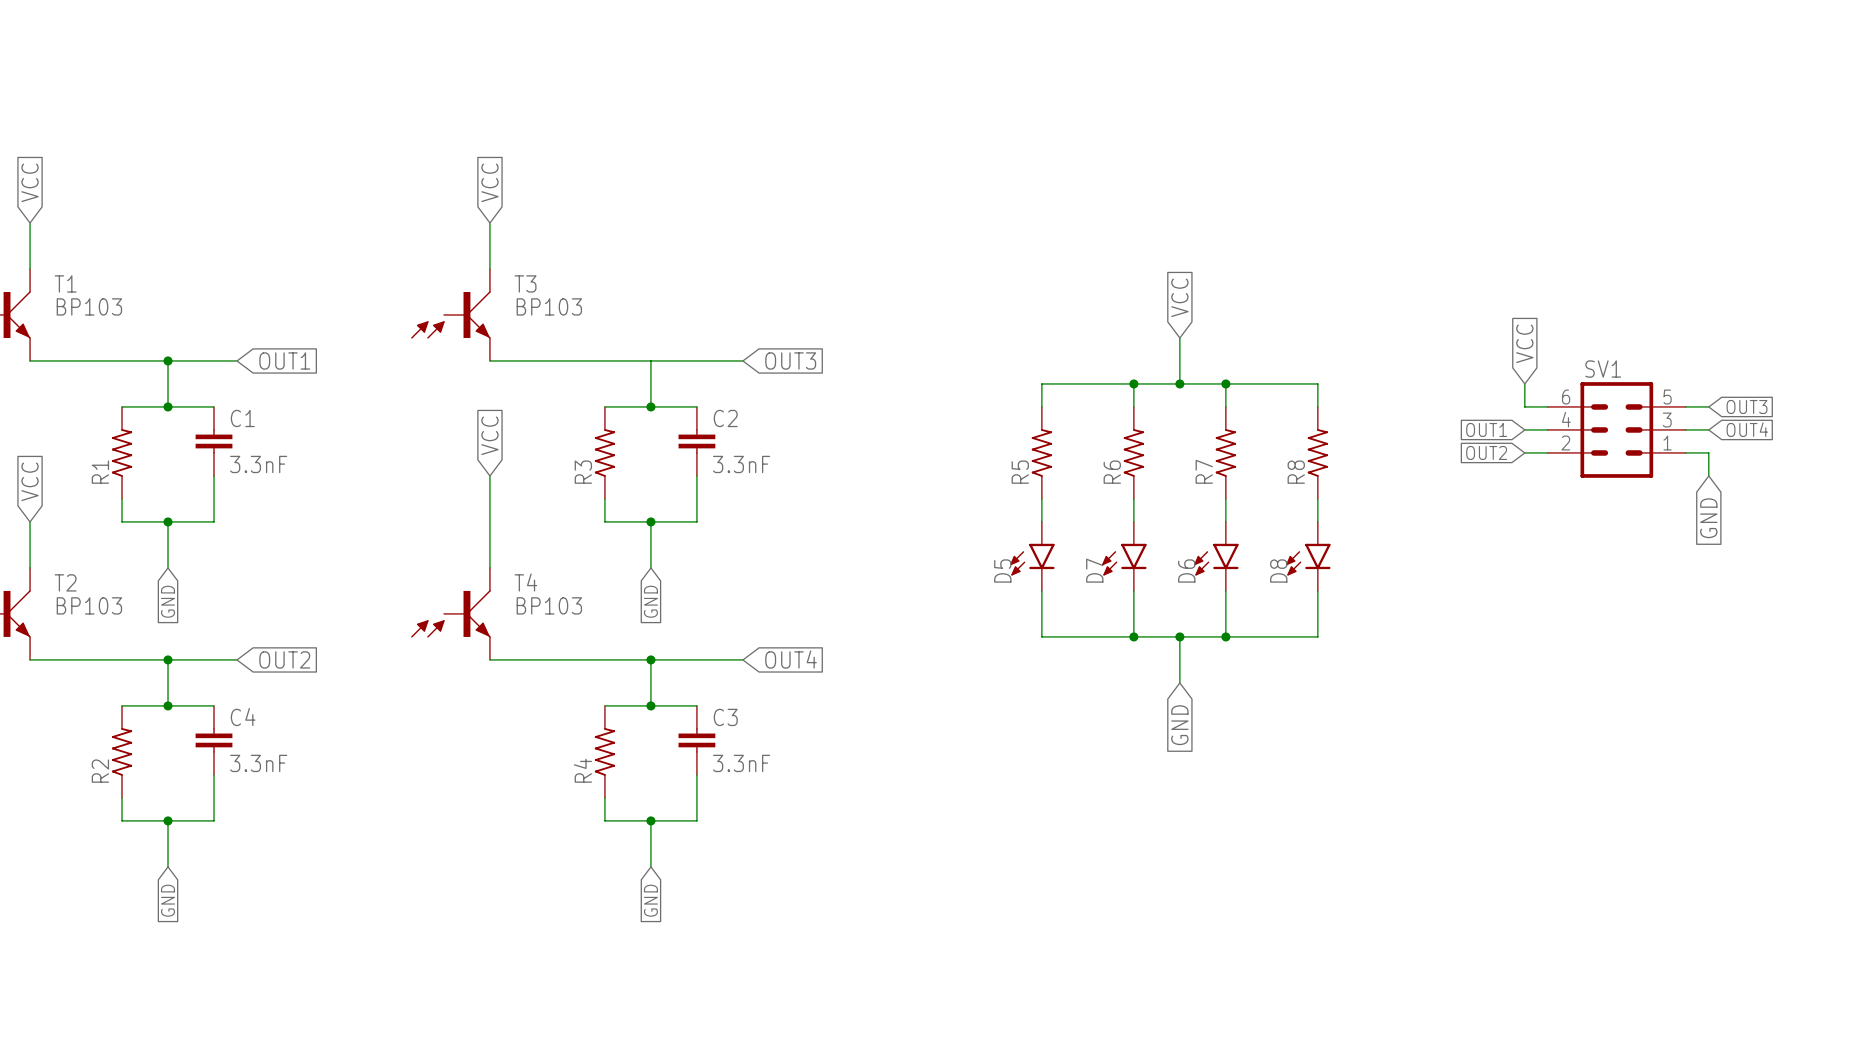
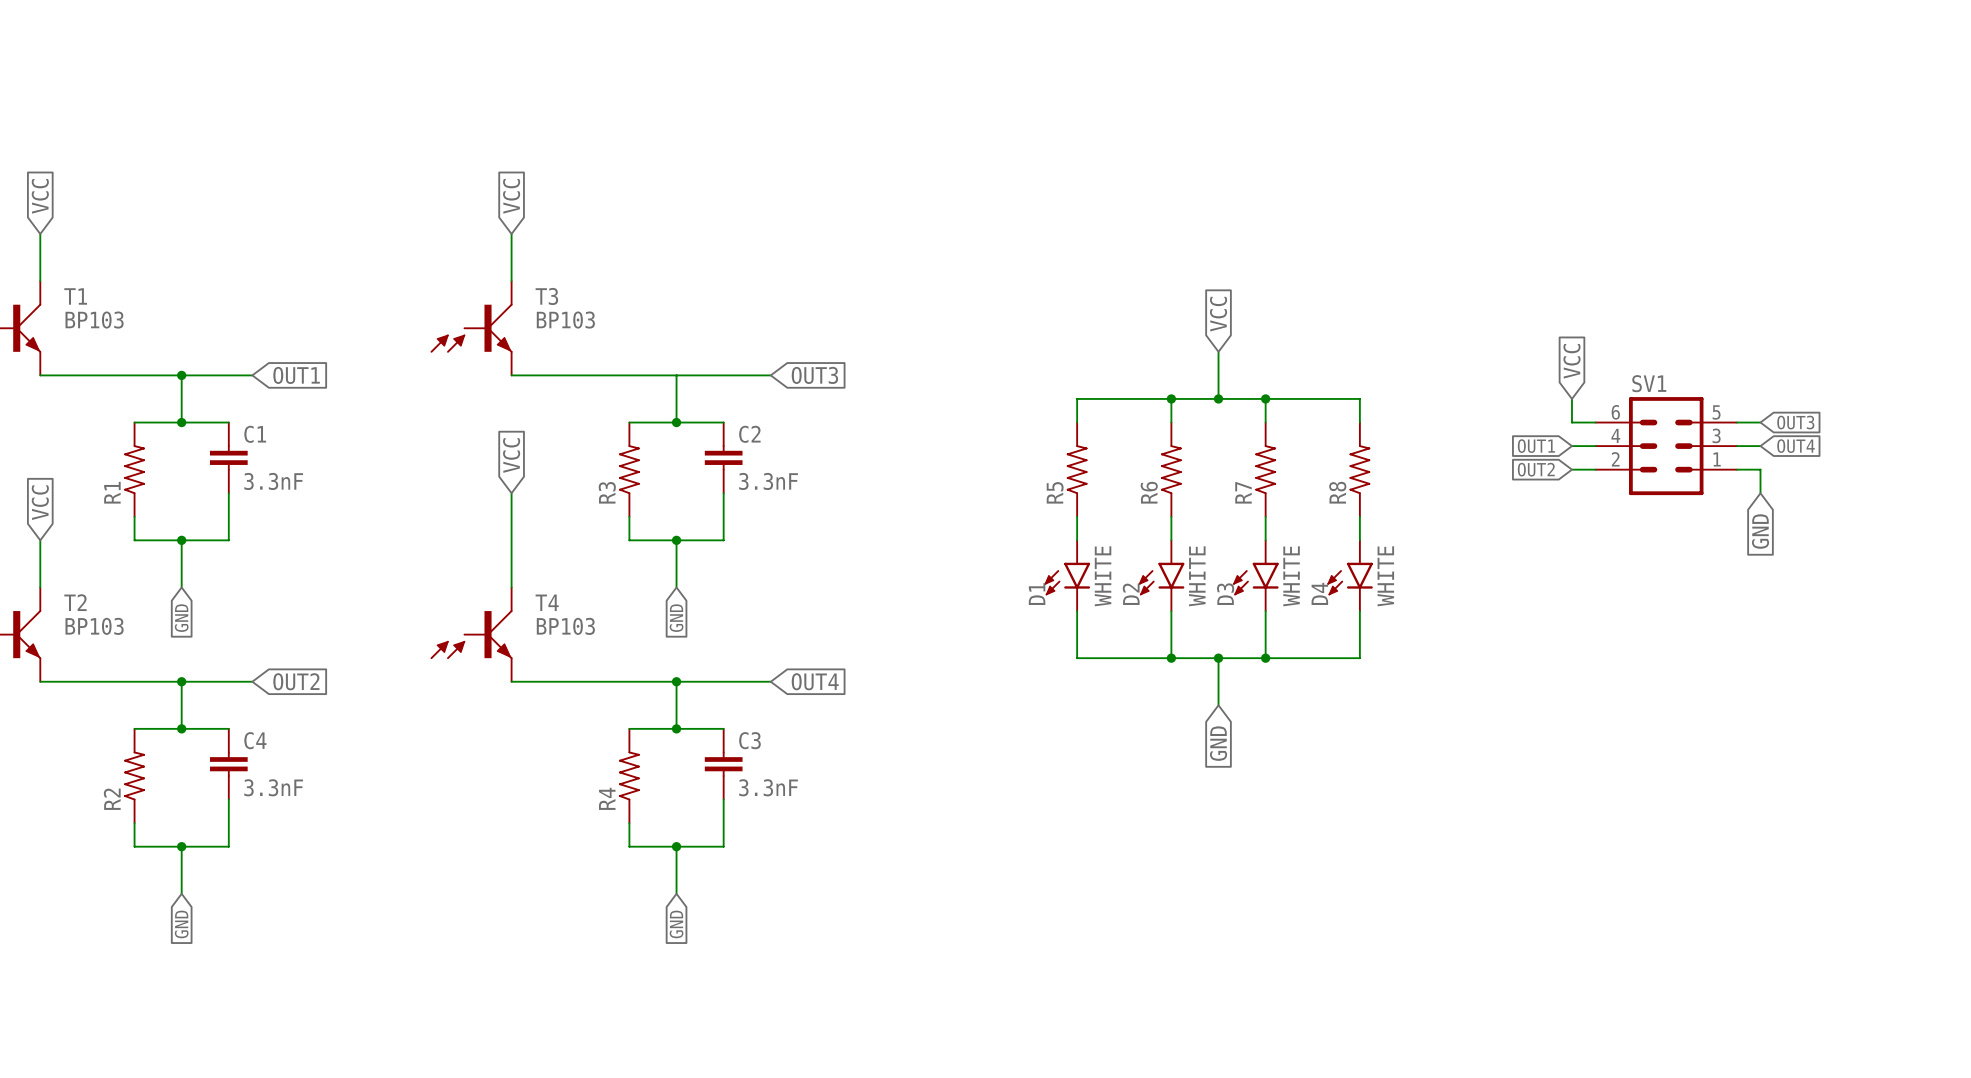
D5 value: none -> WHITE (1103, 576)
D7 value: none -> WHITE (1197, 576)
D6 value: none -> WHITE (1291, 576)
D8 value: none -> WHITE (1385, 576)
D7 name: D7 (1094, 570) -> D2 (1131, 594)
D5 name: D5 (1002, 571) -> D1 (1037, 594)
D6 name: D6 (1186, 571) -> D3 (1225, 594)
D8 name: D8 (1278, 571) -> D4 (1319, 593)

